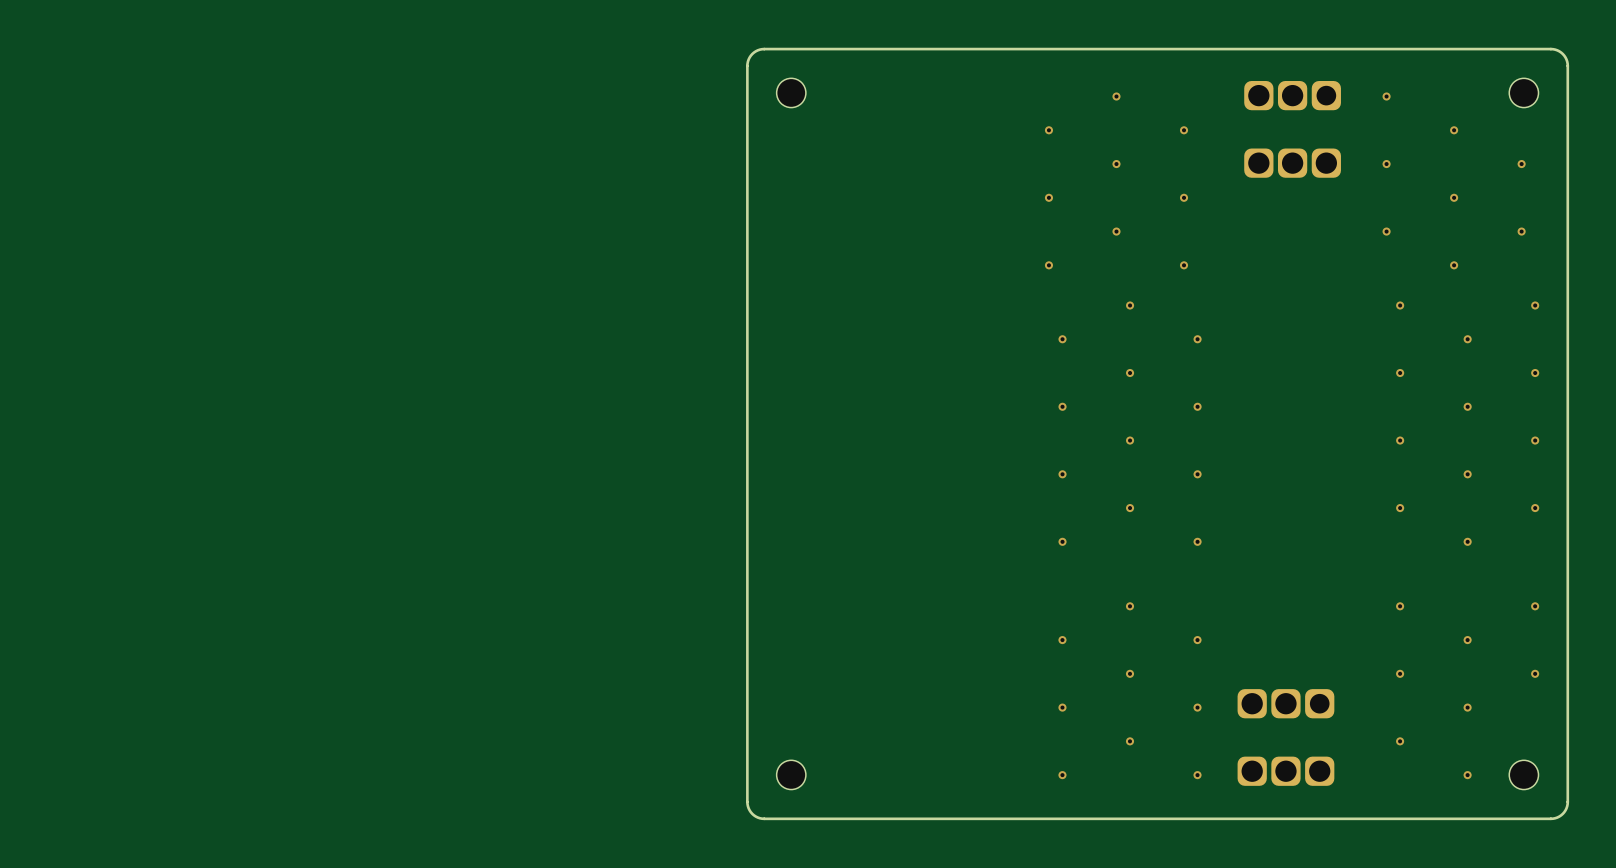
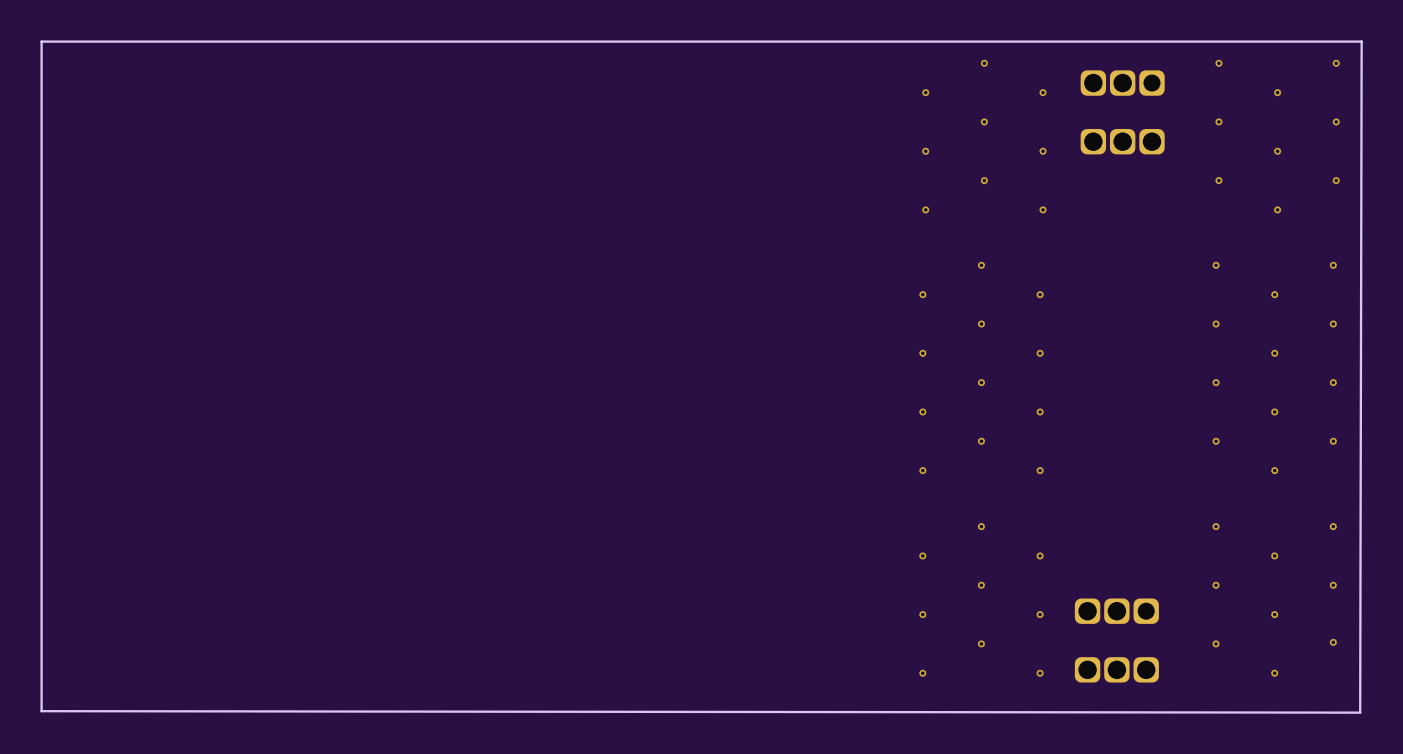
board edge: (1550, 49) (764, 49) (752, 54) (747, 65) (747, 801) (752, 813) (764, 818) (1550, 818) (1562, 813) (1567, 801) (1567, 65) (1562, 54) (1550, 49) -> (1361, 41) (1360, 712) (41, 711) (41, 41) (1361, 41)
via: none -> (984, 63)
via: none -> (1218, 63)
via: none -> (1336, 63)
part: (791, 92) -> none
part: (1523, 92) -> none
via: (1116, 96) -> none
via: (1386, 96) -> none
via: none -> (925, 92)
via: none -> (1043, 92)
via: none -> (1277, 92)
via: (1048, 130) -> none
via: (1184, 130) -> none
via: (1454, 130) -> none
via: none -> (984, 121)
via: none -> (1218, 121)
via: none -> (1336, 121)
via: (1116, 164) -> none
via: (1386, 164) -> none
via: (1521, 164) -> none
via: none -> (925, 151)
via: none -> (1043, 151)
via: none -> (1277, 151)
via: (1048, 197) -> none
via: (1184, 197) -> none
via: (1454, 197) -> none
via: none -> (984, 180)
via: none -> (1218, 180)
via: none -> (1336, 180)
via: (1116, 231) -> none
via: (1386, 231) -> none
via: (1521, 231) -> none
via: none -> (925, 209)
via: none -> (1043, 209)
via: none -> (1277, 209)
via: (1048, 265) -> none
via: (1184, 265) -> none
via: (1454, 265) -> none
via: none -> (1333, 642)
part: (791, 774) -> none
part: (1523, 774) -> none

